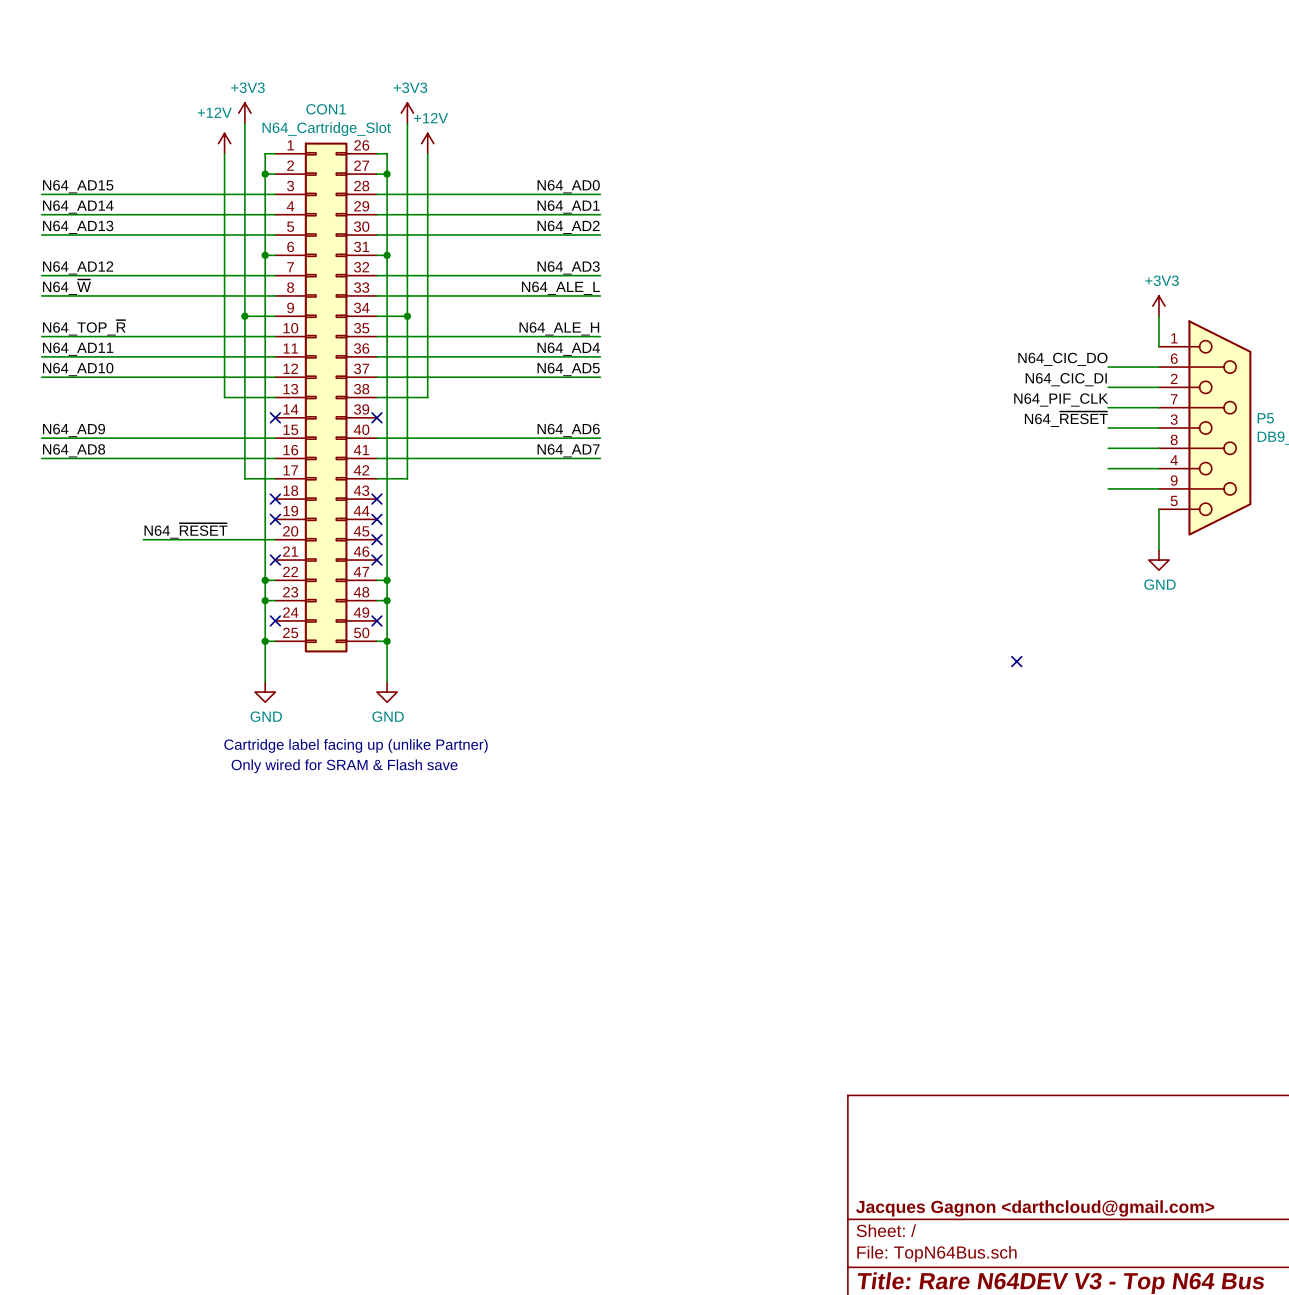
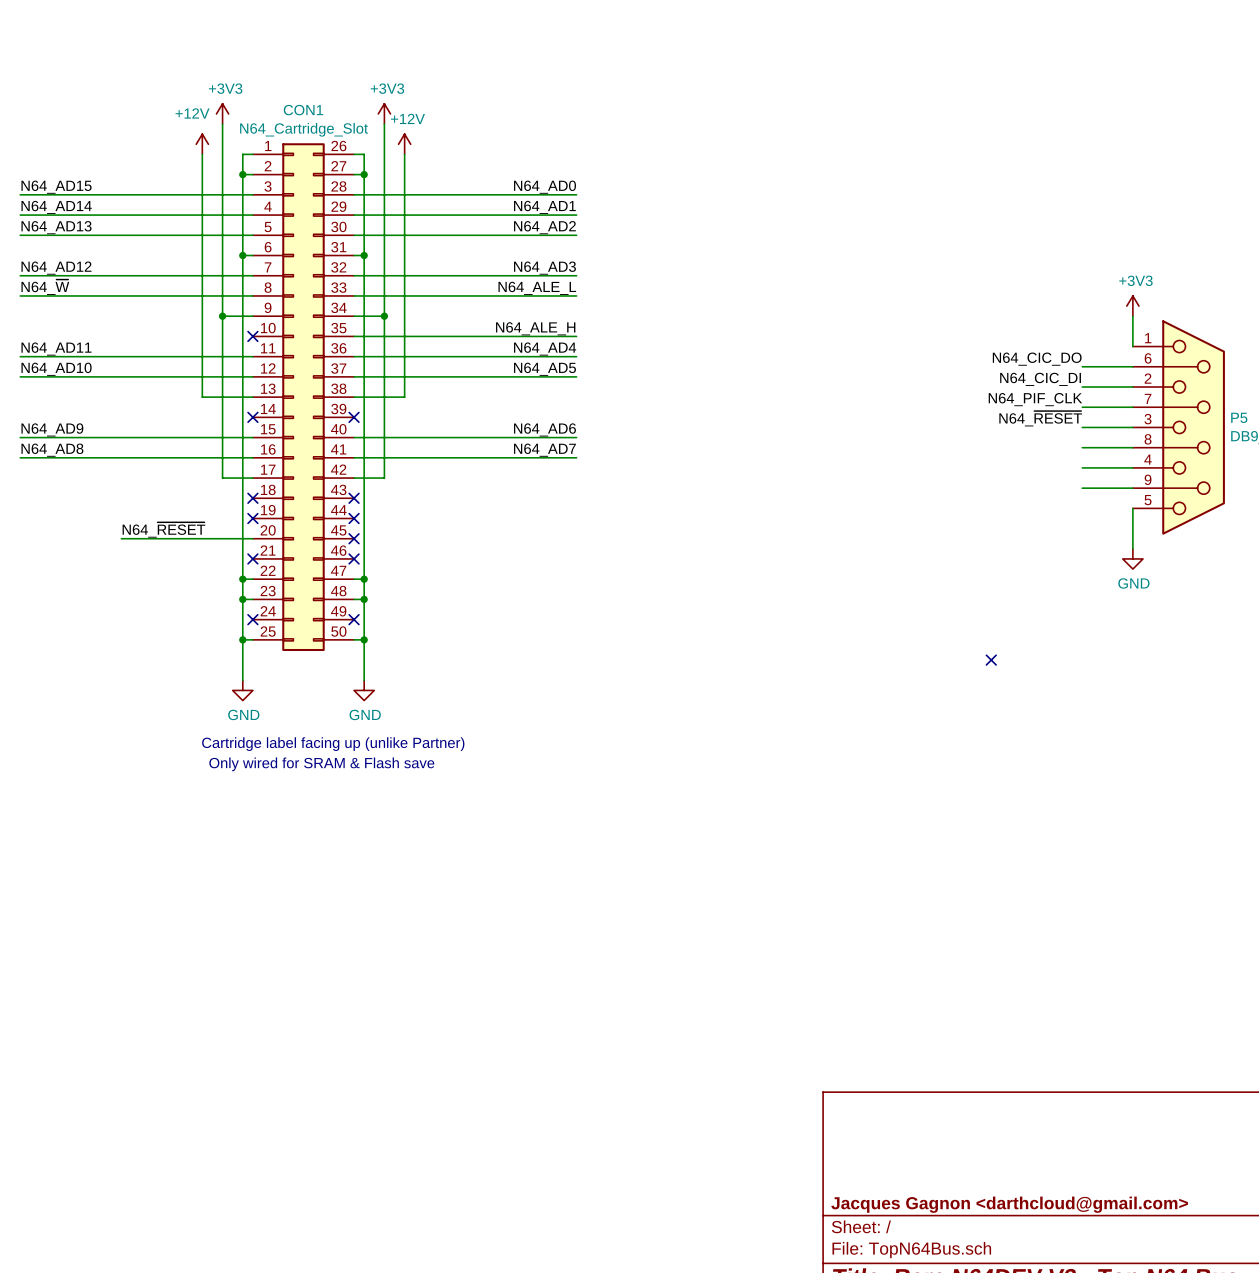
label: N64_TOP_~{R} (84, 327) -> none
wire: (41, 336) (275, 336) -> none
no-connect mark: none -> (252, 336)

